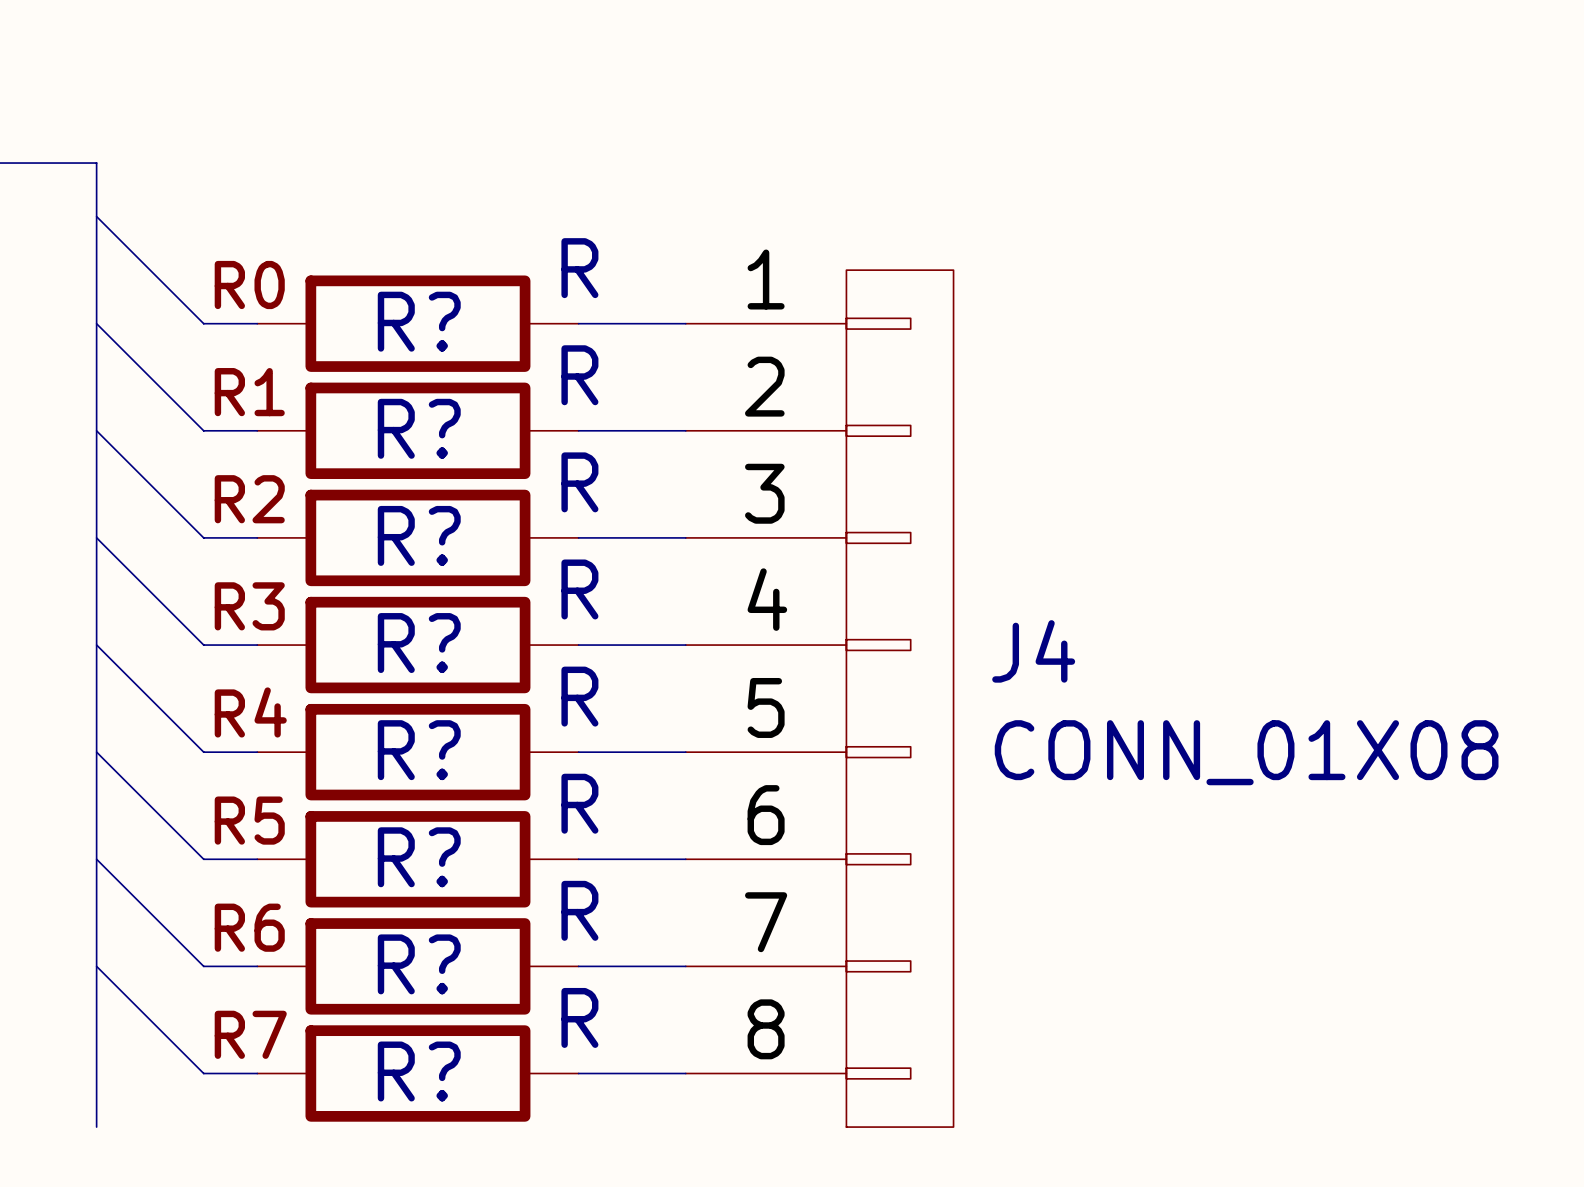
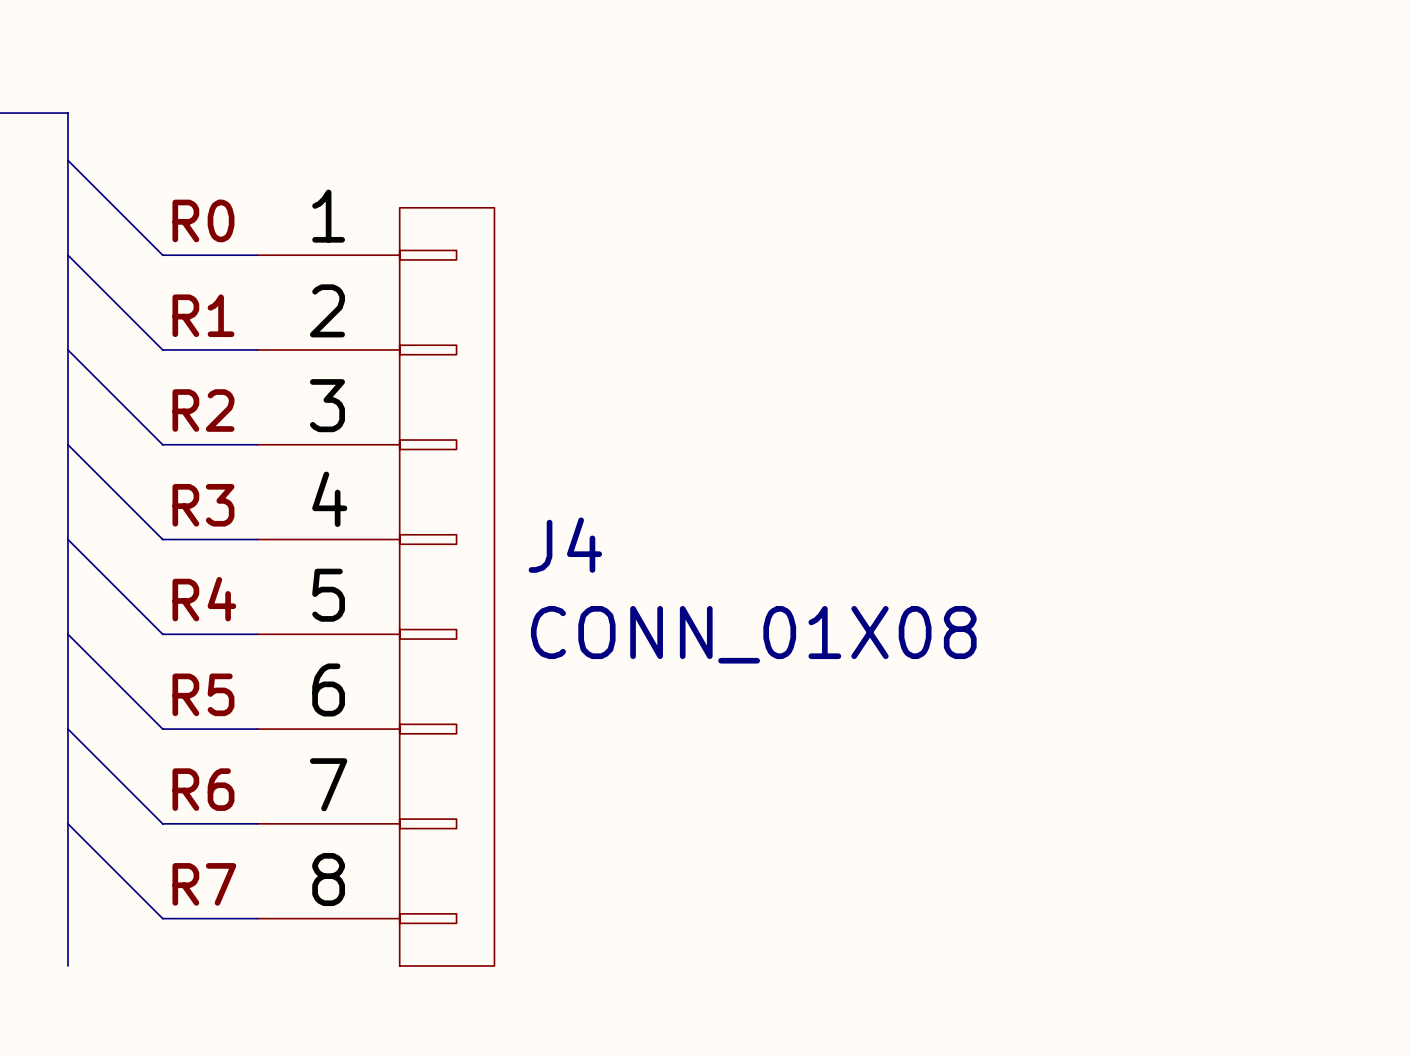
R?: R (417, 323) -> none
wire: (578, 323) (685, 323) -> none
R?: R (417, 430) -> none
wire: (578, 430) (685, 430) -> none
R?: R (417, 537) -> none
wire: (578, 537) (685, 537) -> none
R?: R (417, 645) -> none
wire: (578, 645) (685, 645) -> none
J4 position: (819, 698) -> (375, 586)
R?: R (417, 752) -> none
wire: (578, 752) (685, 752) -> none
R?: R (417, 859) -> none
wire: (578, 859) (685, 859) -> none
R?: R (417, 966) -> none
wire: (578, 966) (685, 966) -> none
R?: R (417, 1073) -> none
wire: (578, 1073) (685, 1073) -> none

